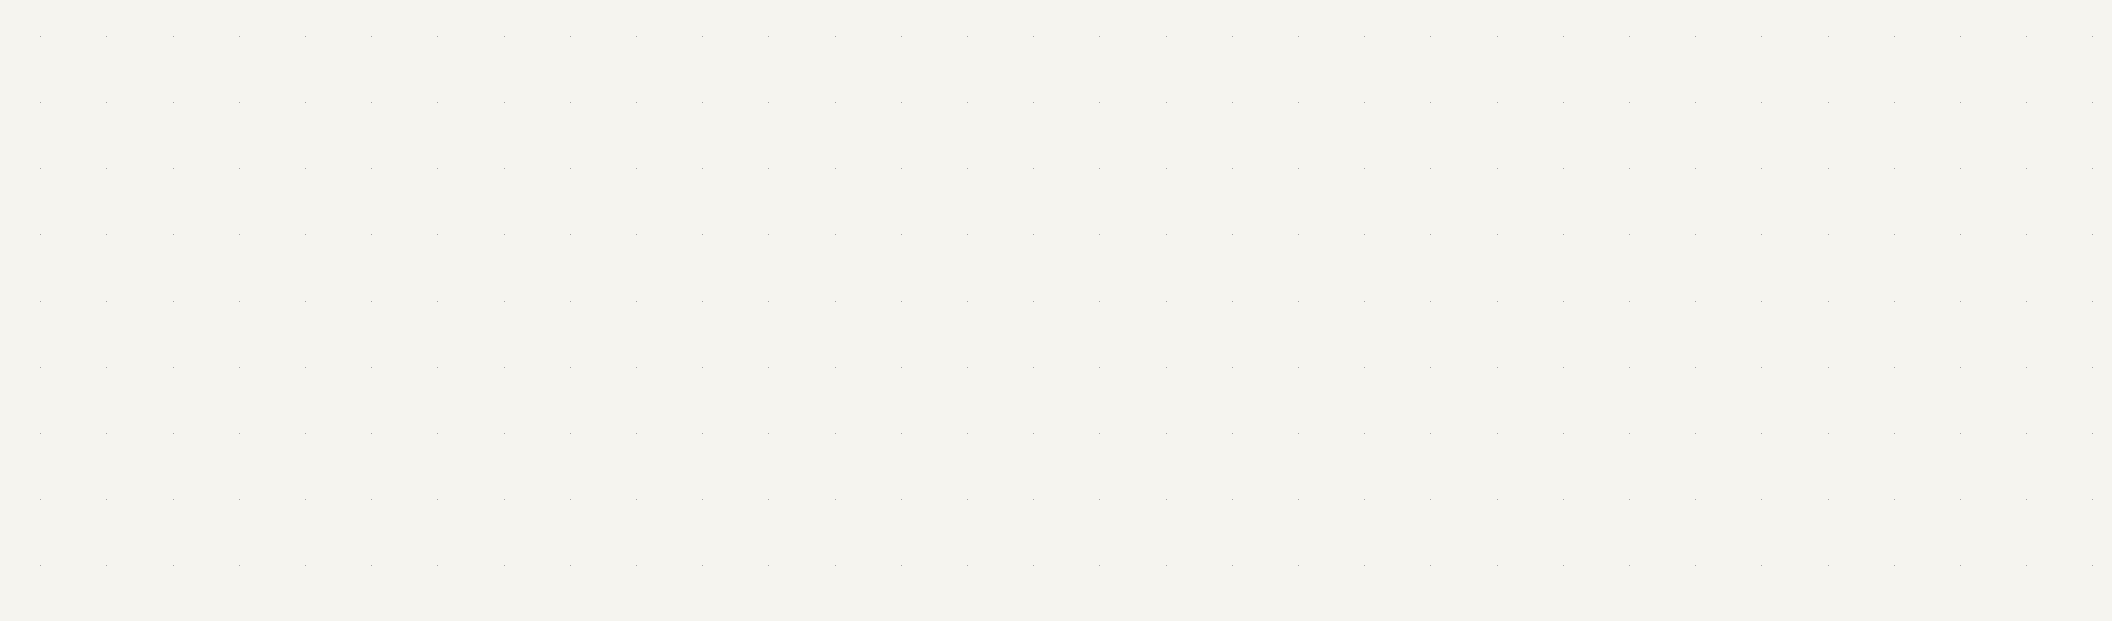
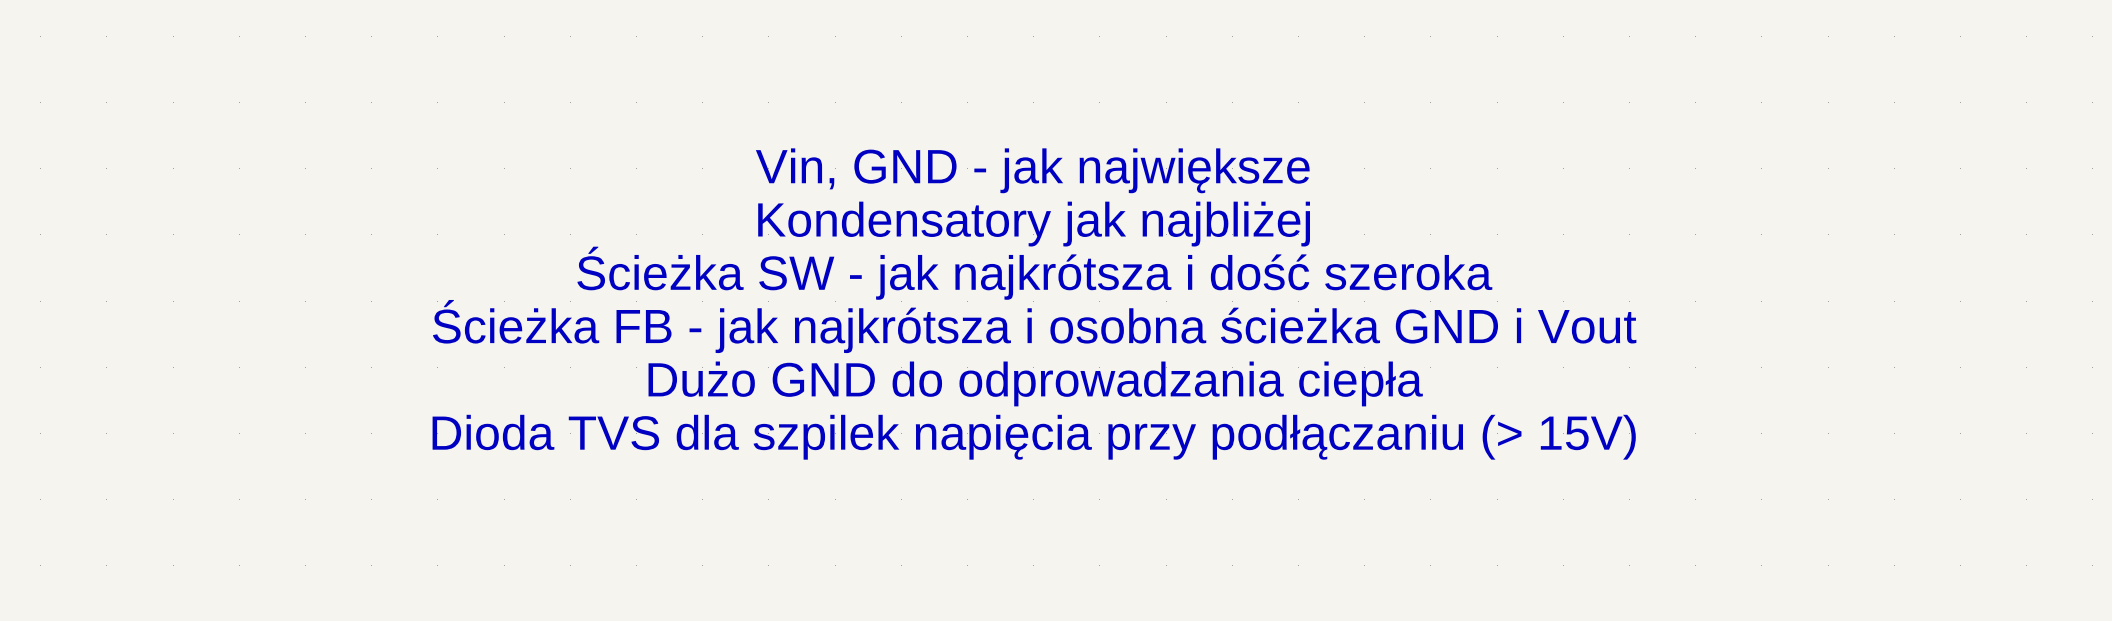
text: none -> Vin, GND - jak największe (1032, 170)
text: none -> Kondensatory jak najbliżej (1034, 224)
text: none -> Ścieżka SW - jak najkrótsza i dość szeroka (1034, 273)
text: none -> Ścieżka FB - jak najkrótsza i osobna ścieżka GND i Vout (1034, 326)
text: none -> Dużo GND do odprowadzania ciepła (1035, 383)
text: none -> Dioda TVS dla szpilek napięcia przy podłączaniu (> 15V) (1034, 437)

